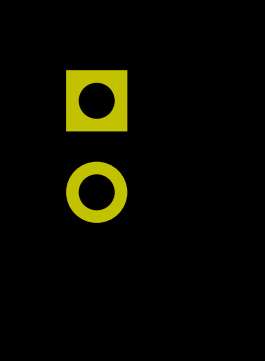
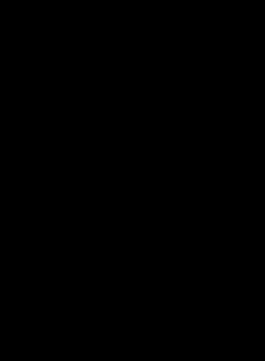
part: (96, 146) -> none

